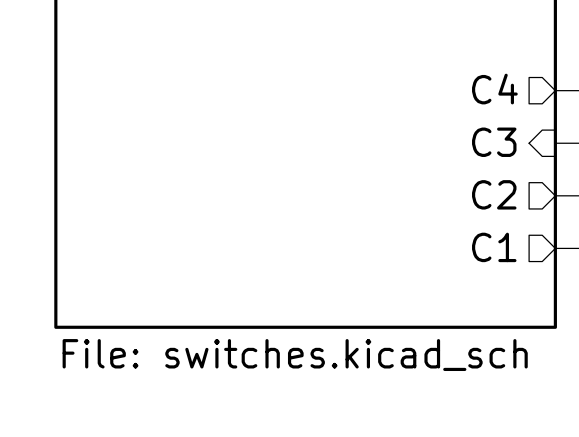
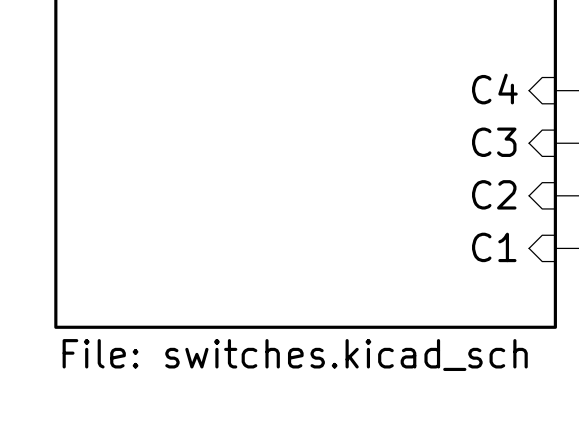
sheet pin shape: output (494, 89) -> input (494, 89)
sheet pin shape: output (494, 194) -> input (494, 194)
sheet pin shape: output (494, 247) -> input (494, 247)

